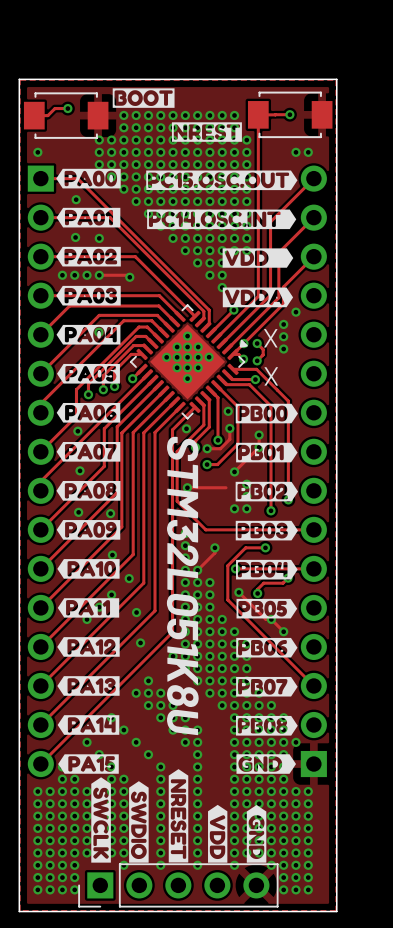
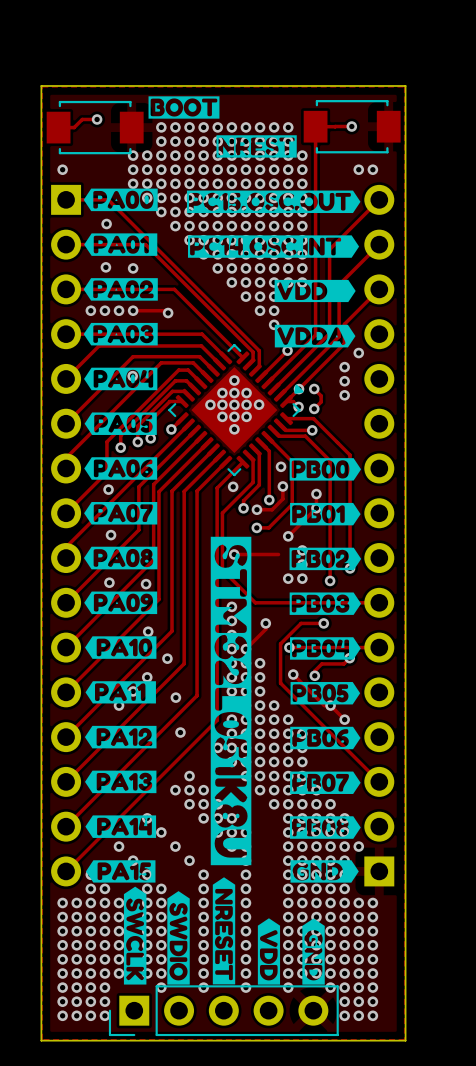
text: X (270, 338) -> none
text: X (271, 376) -> none
drawing: none -> [210, 536, 252, 866]
text: STM32L051K8U (182, 585) -> none

